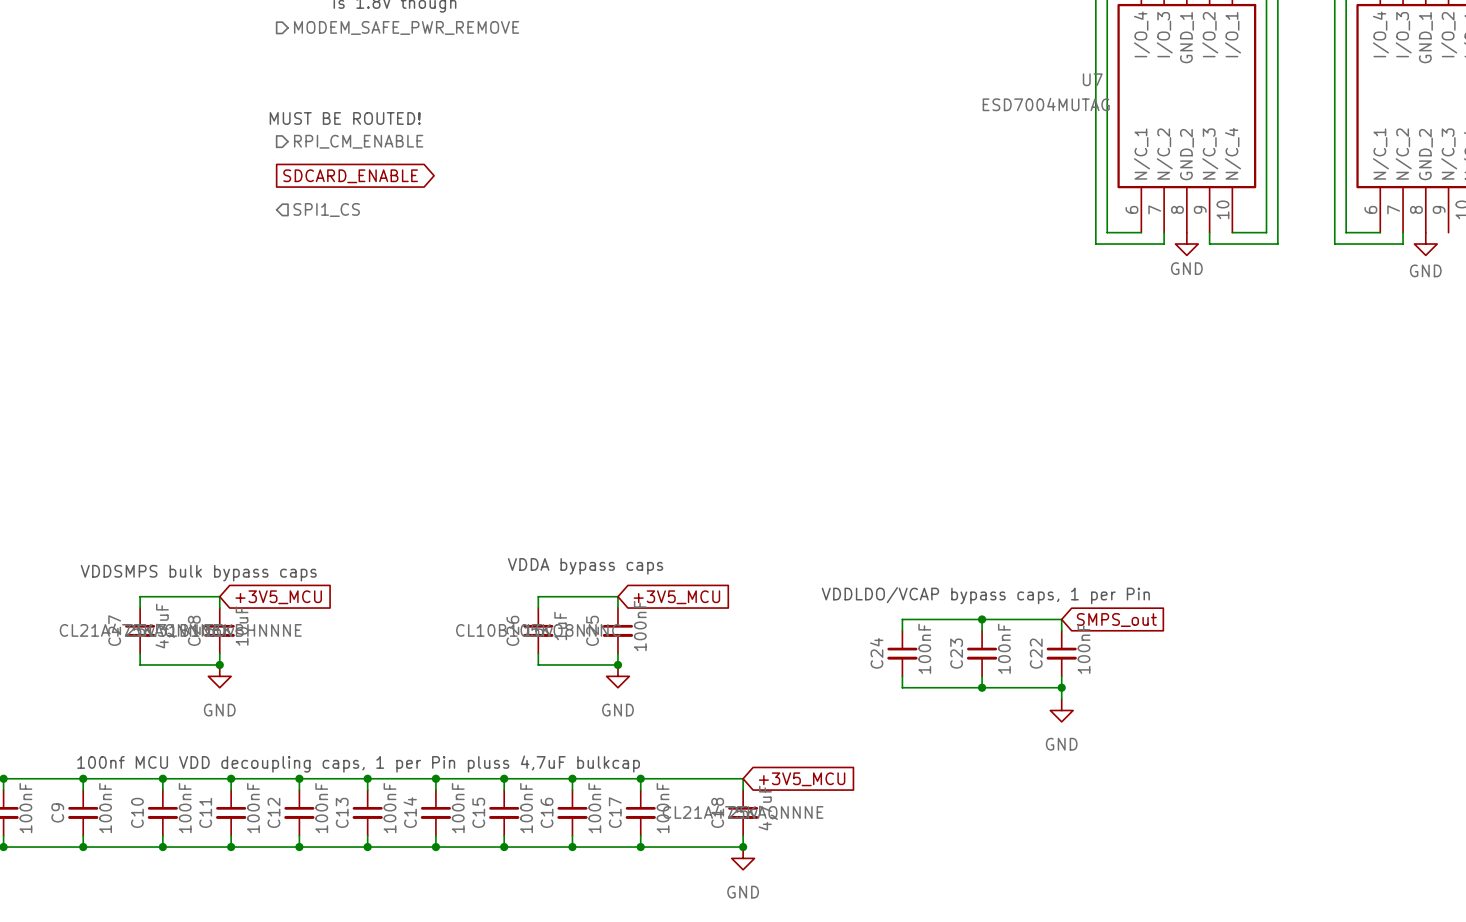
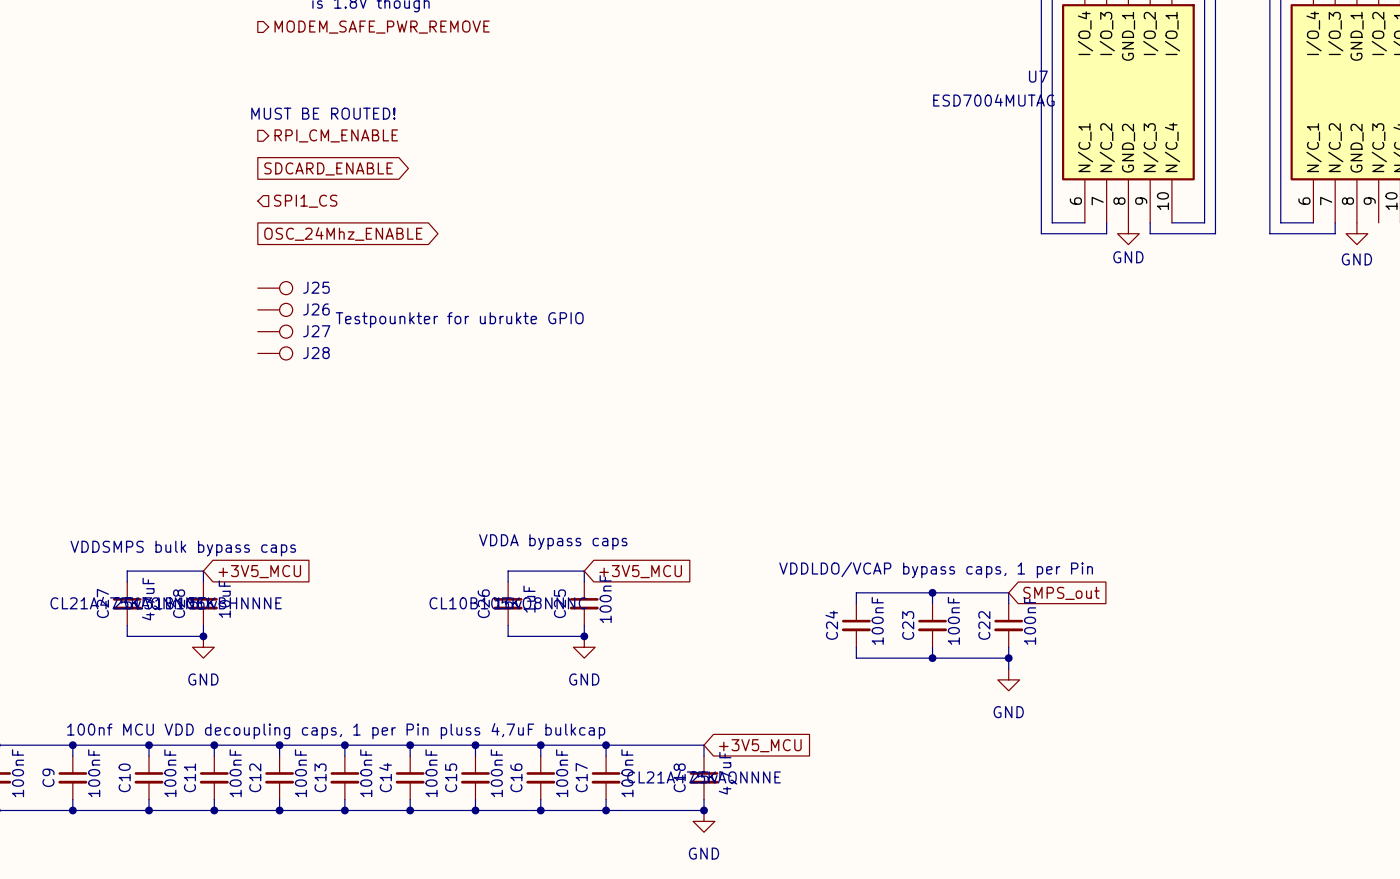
global label: none -> OSC_24Mhz_ENABLE (343, 233)
J25: none -> (275, 288)
J26: none -> (275, 309)
text: none -> Testpounkter for ubrukte GPIO (459, 320)
J27: none -> (275, 331)
J28: none -> (275, 353)

